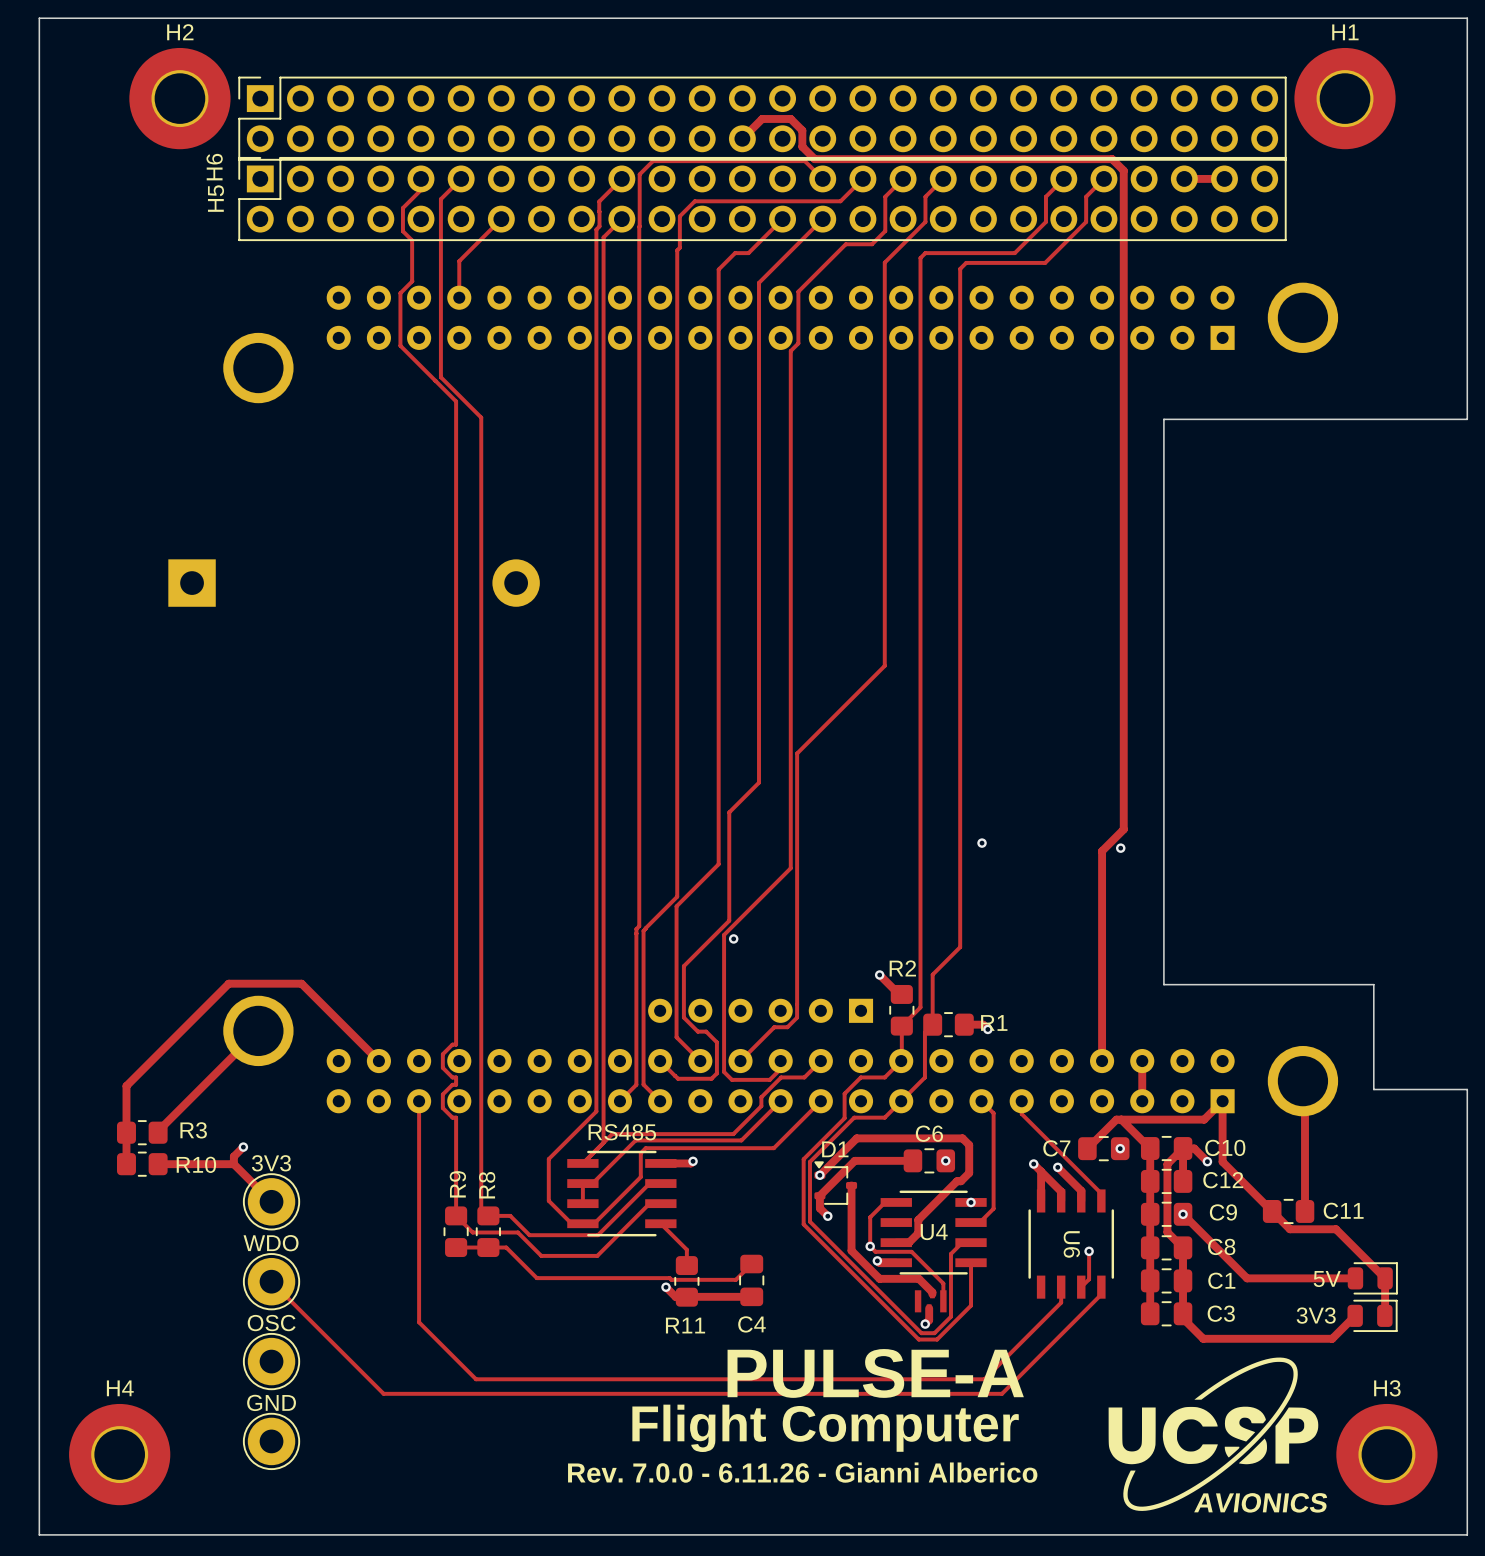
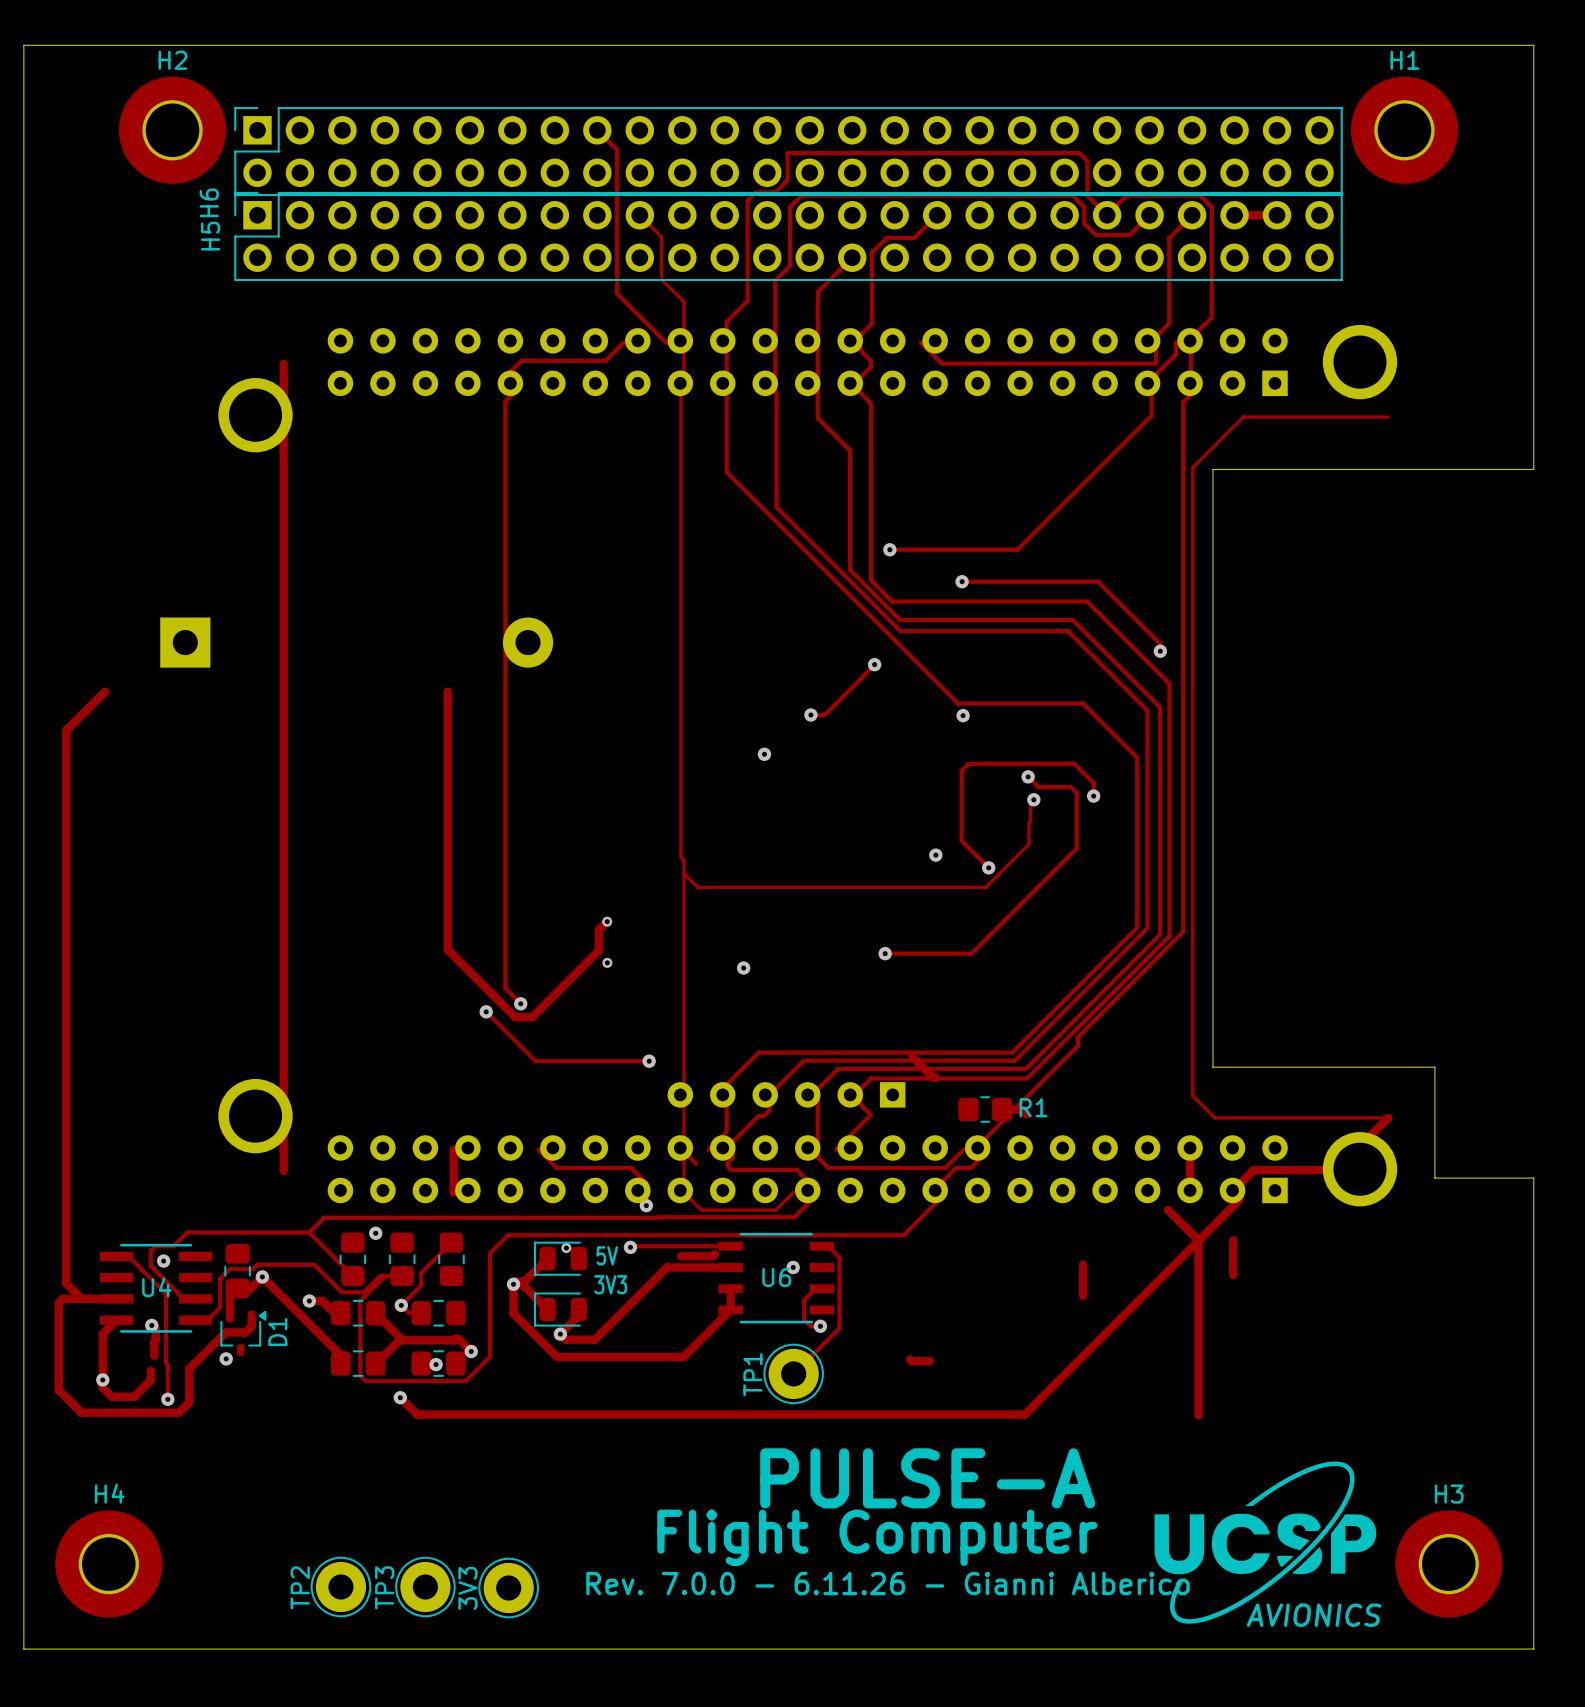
track: none -> (597, 130) (617, 149) (617, 293) (666, 342)
track: (742, 138) (762, 118) (790, 118) (802, 130) (802, 146) (814, 159) (1112, 159) (1123, 170) (1123, 829) (1102, 851) (1102, 1061) -> none
track: none -> (759, 192) (755, 192) (747, 200) (747, 300) (726, 321) (726, 472) (958, 703) (1083, 703) (1137, 757) (1137, 927) (1012, 1052) (758, 1052) (726, 1084) (726, 1131) (708, 1149)
track: none -> (759, 192) (775, 192) (787, 180) (787, 153) (1079, 153) (1087, 161) (1087, 195) (1107, 215) (1126, 195) (1200, 195) (1211, 207) (1211, 317) (1193, 336) (1193, 349) (1190, 352) (1193, 392) (1183, 402) (1183, 931) (1078, 1036) (1078, 1045) (981, 1142) (981, 1157) (970, 1168) (955, 1168) (939, 1184) (939, 1199) (903, 1235) (508, 1235) (489, 1253) (489, 1356) (465, 1381) (365, 1381) (360, 1375) (360, 1301) (385, 1276)
track: (420, 178) (420, 190) (402, 208) (402, 231) (412, 240) (412, 281) -> none
track: (461, 178) (440, 199) (440, 377) (481, 417) (481, 1208) (488, 1215) (510, 1215) (529, 1235) (597, 1235) (649, 1183) (660, 1183) -> none
track: (621, 178) (599, 201) (599, 226) (596, 229) (596, 1111) (548, 1159) (548, 1200) (571, 1223) (594, 1223) (640, 1177) (640, 1153) (645, 1148) (773, 1148) (820, 1101) -> (639, 215) (661, 237) (661, 279) (683, 301) (683, 392) (680, 395) (680, 857) (683, 860) (683, 1192) (701, 1210) (775, 1210) (793, 1192)
track: (822, 178) (804, 161) (652, 161) (639, 174) (639, 926) (636, 929) (636, 1084) (619, 1101) -> none
track: (862, 178) (840, 201) (694, 201) (679, 216) (679, 247) (677, 250) (677, 896) (643, 930) (643, 1084) (660, 1101) -> none
track: (943, 178) (925, 196) (925, 221) (884, 262) (884, 665) (797, 753) (797, 1017) (787, 1027) (774, 1027) (740, 1061) -> none
track: (1063, 178) (1045, 196) (1045, 221) (1014, 253) (925, 253) (920, 258) (920, 1007) (901, 1026) (901, 1060) (884, 1077) (860, 1077) (844, 1093) (844, 1118) (803, 1159) (803, 1224) (918, 1339) (937, 1339) (971, 1305) (971, 1262) -> none
track: none -> (1192, 215) (1169, 238) (1169, 323) (1156, 336) (1156, 363) (941, 363) (920, 342)
track: (885, 196) (885, 231) (872, 244) (845, 244) (798, 291) (798, 343) (790, 351) (790, 868) (724, 934) (724, 1071) (731, 1079) (769, 1079) (780, 1069) (780, 1061) -> (918, 234) (914, 238) (886, 238) (871, 252) (871, 323) (860, 335) (860, 350) (870, 360) (870, 366) (860, 377) (860, 392) (870, 403) (870, 580) (892, 601) (1087, 601) (1169, 683) (1169, 936) (1027, 1078) (870, 1078) (860, 1089) (860, 1104) (870, 1114) (835, 1149)
track: (1086, 196) (1086, 221) (1045, 262) (966, 262) (960, 268) (960, 947) (932, 974) (932, 1024) (924, 1032) (924, 1077) (884, 1117) (854, 1117) (809, 1161) (809, 1221) (921, 1333) (934, 1333) (950, 1316) (950, 1253) (962, 1242) (971, 1242) -> (1130, 234) (1095, 234) (1084, 223) (1084, 207) (1072, 195) (801, 195) (790, 207) (790, 265) (775, 280) (776, 507) (900, 631) (1068, 631) (1147, 710) (1147, 928) (1014, 1060) (803, 1060) (769, 1095) (769, 1110) (763, 1116) (758, 1116) (732, 1141) (732, 1158) (727, 1163) (731, 1169) (796, 1169) (811, 1184) (811, 1199) (794, 1217) (657, 1217)
track: (501, 219) (459, 261) (459, 297) -> none
track: (621, 219) (603, 237) (603, 1142) -> none
track: (782, 219) (748, 253) (735, 253) (718, 269) (718, 864) (676, 906) (676, 1037) (700, 1061) -> none
track: (790, 251) (759, 282) (759, 782) (729, 812) (729, 920) (683, 966) (683, 1017) (697, 1031) (706, 1031) (716, 1042) (716, 1073) (711, 1078) (678, 1078) (675, 1075) -> (817, 292) (817, 418) (850, 450) (850, 570) (899, 619) (1072, 619) (1159, 707) (1159, 934) (1025, 1069) (837, 1069) (817, 1089) (817, 1157) (828, 1168) (945, 1168) (963, 1149)
track: (412, 281) (400, 293) (400, 345) (456, 401) (456, 1044) (452, 1044) (442, 1054) (442, 1067) (452, 1077) (456, 1077) (456, 1084) (452, 1084) (442, 1094) (442, 1108) (452, 1117) (456, 1117) (456, 1215) (472, 1232) (517, 1232) (541, 1255) (597, 1255) (649, 1203) (660, 1203) -> none
track: none -> (623, 342) (605, 360) (521, 360) (509, 372) (514, 377) (514, 392) (505, 401) (505, 988) (520, 1003)
track: none -> (1175, 342) (1175, 354) (1151, 378) (1151, 415) (1017, 549) (889, 549)
track: none -> (283, 363) (283, 1171)
track: none -> (1388, 417) (1243, 417) (1192, 467) (1192, 1095) (1214, 1117) (1388, 1117) (1336, 1170) (1253, 1170) (1238, 1185) (1238, 1200) (1024, 1414) (417, 1414) (400, 1397)
via: none -> (889, 549)
track: none -> (962, 581) (1098, 581) (1160, 643) (1160, 651)
via: none -> (962, 581)
via: none -> (1160, 651)
track: none -> (874, 664) (824, 714) (810, 714)
via: none -> (874, 664)
track: none -> (105, 691) (66, 730) (66, 1283) (81, 1298)
track: none -> (447, 691) (447, 949) (515, 1017) (532, 1017) (598, 950) (598, 930) (607, 921)
via: none -> (810, 714)
via: none -> (963, 715)
via: none -> (764, 754)
track: none -> (1028, 776) (1038, 787) (1070, 787) (1076, 792) (1076, 848) (971, 953) (885, 953)
via: none -> (1028, 776)
track: none -> (1093, 796) (1093, 783) (1074, 763) (968, 763) (961, 770) (961, 840) (988, 867)
via: none -> (1093, 796)
track: none -> (1033, 799) (1030, 802) (1029, 844) (985, 887) (697, 887) (683, 873)
via: none -> (1033, 799)
via: none -> (935, 855)
via: none -> (988, 867)
via: (982, 843) -> none
via: none -> (607, 921)
via: (1120, 848) -> none
via: none -> (885, 953)
via: none -> (607, 962)
via: none -> (743, 968)
via: none -> (520, 1003)
track: none -> (486, 1011) (535, 1061) (649, 1061)
via: none -> (486, 1011)
via: (733, 938) -> none
via: (879, 975) -> none
via: none -> (649, 1061)
R2: (901, 1010) -> none
via: (987, 1029) -> none
track: (258, 1030) (158, 1132) -> none
track: (378, 1061) (301, 983) (228, 983) (126, 1086) (126, 1164) -> none
track: (820, 1061) (804, 1077) (781, 1077) (761, 1097) (761, 1106) (733, 1134) (612, 1134) (582, 1163) -> none
track: none -> (453, 1149) (453, 1192)
track: none -> (538, 1149) (556, 1168) (631, 1168) (646, 1183) (646, 1205)
track: (1302, 1081) (1305, 1083) (1305, 1211) -> none
track: (419, 1101) (419, 1322) (476, 1379) (984, 1379) (1061, 1302) (1061, 1287) -> none
track: (780, 1101) (741, 1140) (635, 1140) (592, 1183) (582, 1183) (582, 1203) -> none
track: (981, 1101) (993, 1113) (993, 1208) (979, 1222) (971, 1222) -> none
track: (1021, 1101) (1021, 1113) (1101, 1193) (1101, 1200) -> none
via: none -> (646, 1205)
track: none -> (657, 1217) (323, 1217) (309, 1232)
R3: (142, 1132) -> none
track: none -> (309, 1232) (187, 1232) (173, 1246) (155, 1246) (150, 1250) (150, 1265) (183, 1298) (195, 1298)
track: none -> (309, 1232) (352, 1276)
via: none -> (375, 1233)
track: (243, 1147) (233, 1156) (233, 1164) -> none
via: (243, 1147) -> none
track: (1087, 1148) (1116, 1119) (1204, 1119) (1222, 1101) (1222, 1161) (1289, 1229) (1336, 1229) (1385, 1278) (1384, 1315) -> none
C7: (1103, 1148) -> none
via: (1120, 1148) -> none
C10: (1166, 1148) -> none
track: none -> (451, 1242) (421, 1272) (421, 1285) (401, 1305) (409, 1313) (421, 1313)
track: none -> (730, 1246) (630, 1247)
track: none -> (821, 1246) (828, 1246) (839, 1257) (839, 1328) (793, 1373)
via: none -> (566, 1248)
via: none -> (630, 1247)
track: (912, 1160) (854, 1160) (819, 1195) (819, 1208) (827, 1216) -> none
C6: (929, 1160) -> none
via: (945, 1160) -> none
via: (693, 1161) -> none
track: (1207, 1161) (1194, 1148) (1183, 1148) (1167, 1164) (1167, 1232) (1183, 1247) (1183, 1318) (1203, 1338) (1332, 1338) (1355, 1315) -> none
via: (1207, 1161) -> none
track: none -> (116, 1256) (128, 1256) (167, 1295) (165, 1363) (167, 1365) (167, 1399)
3V3 name rotation: 0° (271, 1163) -> 90° counterclockwise (467, 1588)
text: none -> 5V (607, 1255)
R10: (142, 1164) -> none
track: (158, 1164) (233, 1164) -> none
track: (233, 1164) (271, 1201) -> none
track: (1033, 1164) (1061, 1191) (1061, 1200) -> none
via: (1033, 1164) -> none
track: none -> (547, 1258) (524, 1281) (516, 1281) (513, 1284) (513, 1313) (557, 1357) (683, 1357) (730, 1309) (730, 1288)
part: none -> (560, 1258)
part: none -> (352, 1259)
part: none -> (402, 1259)
part: none -> (451, 1259)
via: none -> (163, 1261)
track: (1057, 1167) (1081, 1190) (1081, 1200) -> none
via: (1057, 1167) -> none
track: none -> (730, 1267) (667, 1267) (594, 1339) (565, 1339) (560, 1334) (578, 1315) (578, 1309)
via: none -> (793, 1267)
track: (819, 1175) (856, 1138) (962, 1138) (969, 1145) (969, 1173) (960, 1181) (957, 1181) (918, 1219) (918, 1233) (908, 1242) (896, 1242) -> none
via: (819, 1175) -> none
part: none -> (237, 1271)
C12: (1166, 1181) -> none
via: none -> (262, 1276)
track: none -> (402, 1276) (379, 1276) (363, 1292) (341, 1292) (314, 1264) (257, 1264) (252, 1269) (229, 1269) (220, 1278) (220, 1307) (207, 1320) (195, 1320)
D1 rotation: 0° (835, 1183) -> 90° clockwise (243, 1333)
D1 position: (835, 1183) -> (243, 1333)
track: (851, 1185) (851, 1250) (879, 1278) (918, 1278) (932, 1294) -> none
track: none -> (523, 1281) (523, 1285) (547, 1309)
via: none -> (513, 1284)
text: none -> 3V3 (610, 1284)
RS485: (621, 1193) -> none
track: none -> (821, 1288) (815, 1288) (804, 1300) (804, 1319) (810, 1326) (820, 1326)
3V3 position: (271, 1201) -> (508, 1588)
track: (896, 1202) (885, 1202) (870, 1217) (870, 1246) (875, 1251) (911, 1251) (943, 1283) (943, 1301) -> none
via: (971, 1202) -> none
track: none -> (116, 1298) (62, 1298) (58, 1302) (58, 1390) (81, 1412) (178, 1412) (189, 1402) (189, 1368) (225, 1332) (245, 1332) (251, 1326) (251, 1316)
track: none -> (309, 1301) (322, 1301) (334, 1313) (340, 1313)
via: none -> (309, 1301)
via: none -> (401, 1305)
C11: (1288, 1211) -> none
part: none -> (560, 1309)
C9: (1166, 1214) -> none
track: (1183, 1214) (1247, 1278) (1355, 1278) -> none
via: (1183, 1214) -> none
via: (827, 1216) -> none
part: none -> (358, 1313)
track: none -> (375, 1313) (402, 1340) (458, 1338) (471, 1351)
part: none -> (438, 1313)
track: none -> (229, 1316) (229, 1296) (237, 1288) (250, 1288) (262, 1276) (340, 1355) (340, 1363)
track: none -> (116, 1320) (102, 1334) (102, 1387) (111, 1396) (134, 1396) (150, 1380) (150, 1370)
track: (660, 1223) (686, 1249) (686, 1265) -> none
track: none -> (151, 1325) (155, 1329) (154, 1355)
via: none -> (151, 1325)
via: none -> (820, 1326)
R9: (456, 1231) -> none
R8: (488, 1231) -> none
U4 position: (933, 1232) -> (156, 1288)
via: none -> (560, 1334)
track: none -> (401, 1338) (375, 1363)
U6 rotation: 0° (1071, 1244) -> 90° clockwise (776, 1278)
U6 position: (1071, 1244) -> (776, 1278)
via: (870, 1246) -> none
track: (456, 1247) (506, 1247) (536, 1278) (735, 1279) (751, 1264) -> none
C8: (1166, 1247) -> none
track: (1089, 1251) (1089, 1279) (1081, 1287) -> none
via: (1089, 1251) -> none
via: none -> (471, 1351)
via: none -> (226, 1358)
via: (877, 1260) -> none
part: none -> (358, 1363)
part: none -> (438, 1363)
via: none -> (436, 1364)
TP1: none -> (793, 1373)
5V: (1372, 1278) -> none
via: none -> (102, 1379)
C4: (751, 1280) -> none
C1: (1166, 1280) -> none
track: (271, 1281) (383, 1393) (1001, 1393) (1101, 1294) (1101, 1287) -> none
WDO: (271, 1281) -> none
R11: (686, 1281) -> none
track: (666, 1287) (675, 1297) (751, 1296) -> none
via: (666, 1287) -> none
via: none -> (400, 1397)
via: none -> (167, 1399)
part: (930, 1301) -> none
track: (929, 1308) (929, 1320) (925, 1324) -> none
C3: (1166, 1313) -> none
3V3: (1372, 1315) -> none
via: (925, 1324) -> none
OSC: (271, 1361) -> none
GND: (271, 1441) -> none
TP2: none -> (340, 1587)
TP3: none -> (425, 1587)

